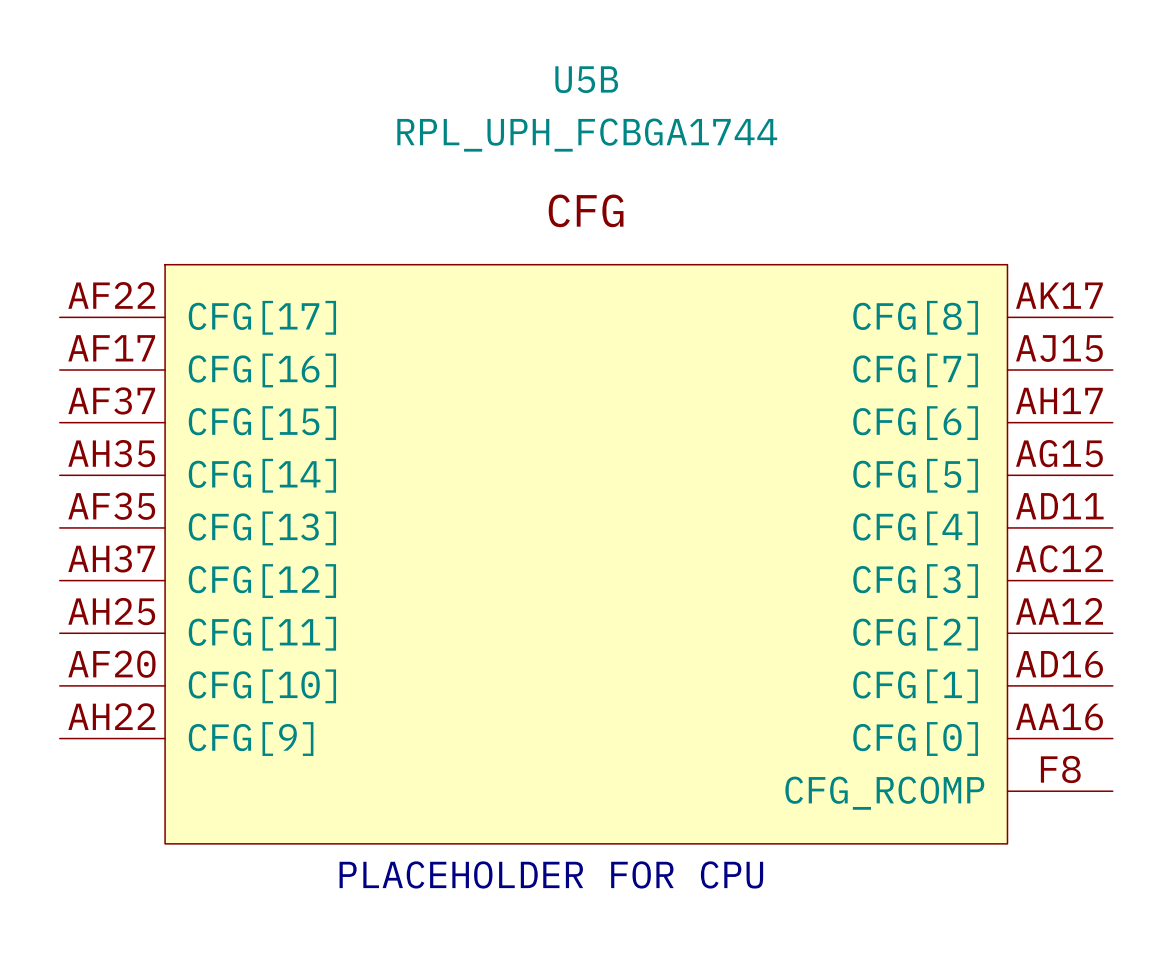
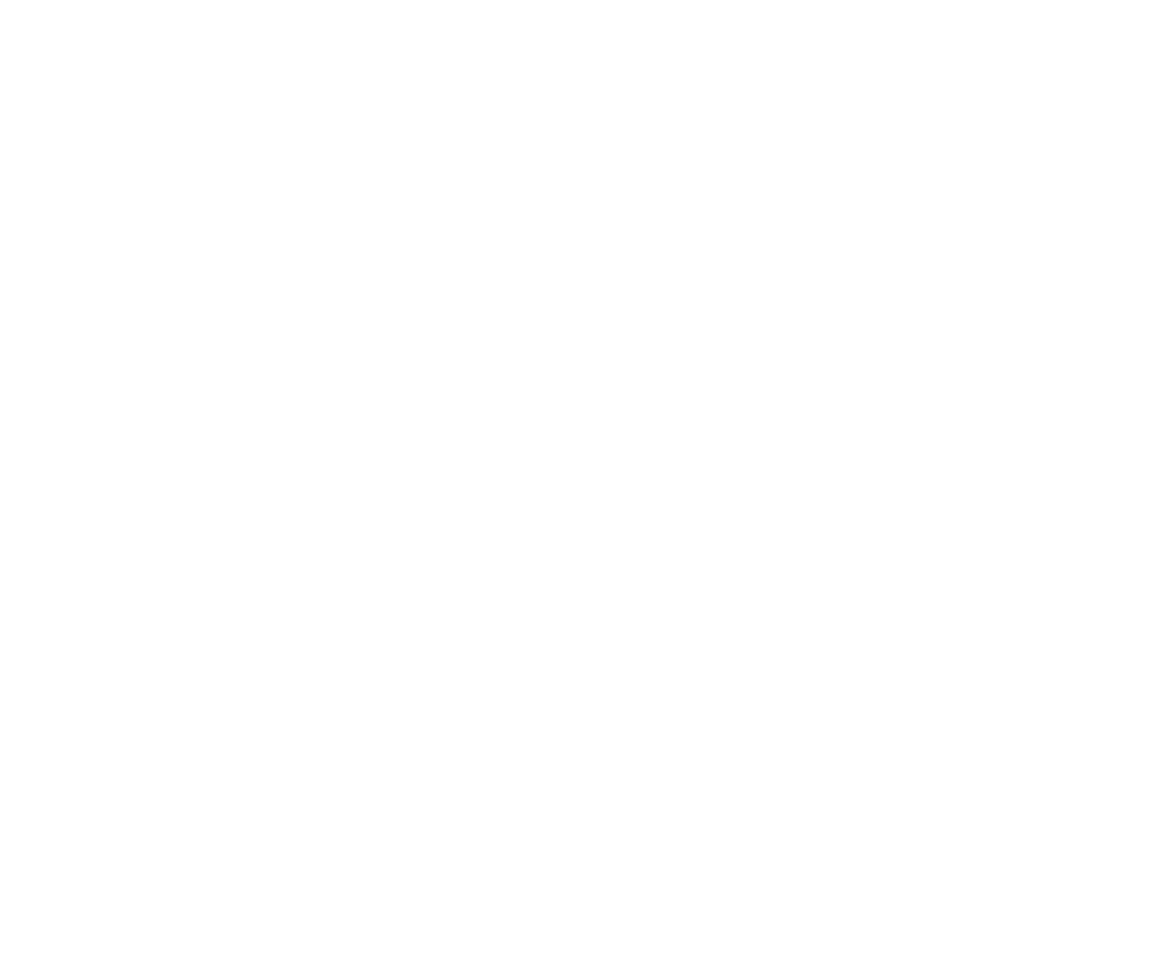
U5B: RPL_UPH_FCBGA1744 (586, 554) -> none
text: PLACEHOLDER FOR CPU (551, 874) -> none

